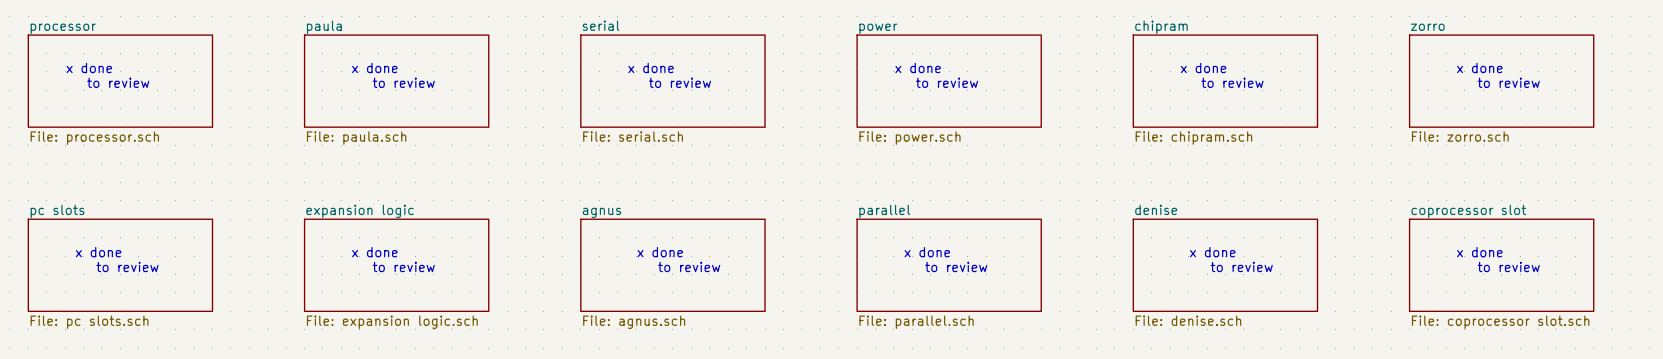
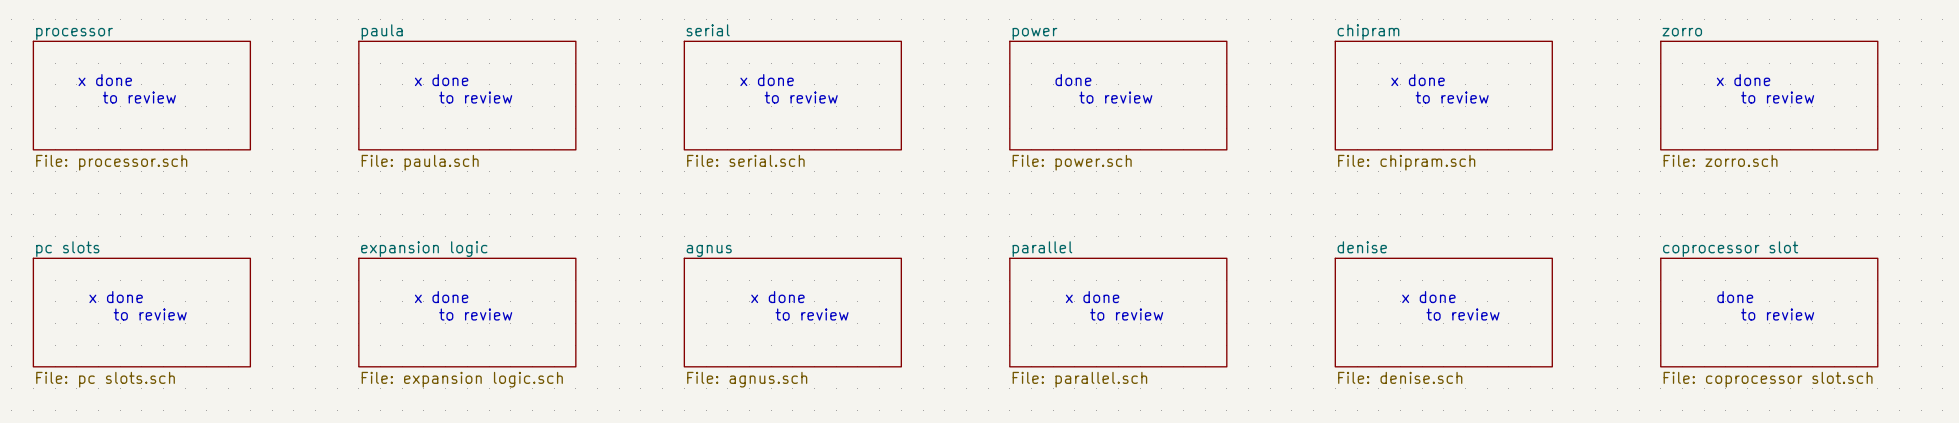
text: x done (918, 67) -> done (1073, 80)
text: x done (1479, 252) -> done (1735, 297)

